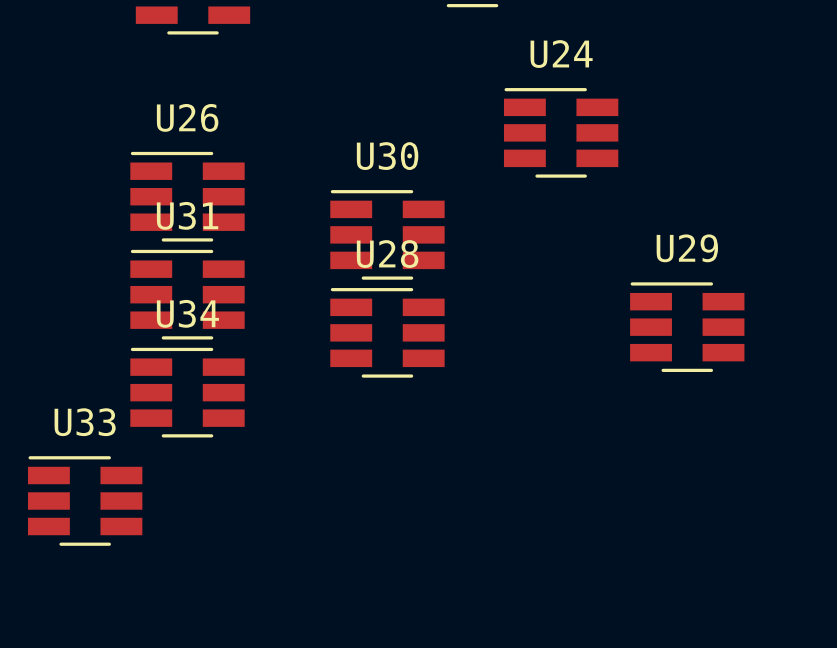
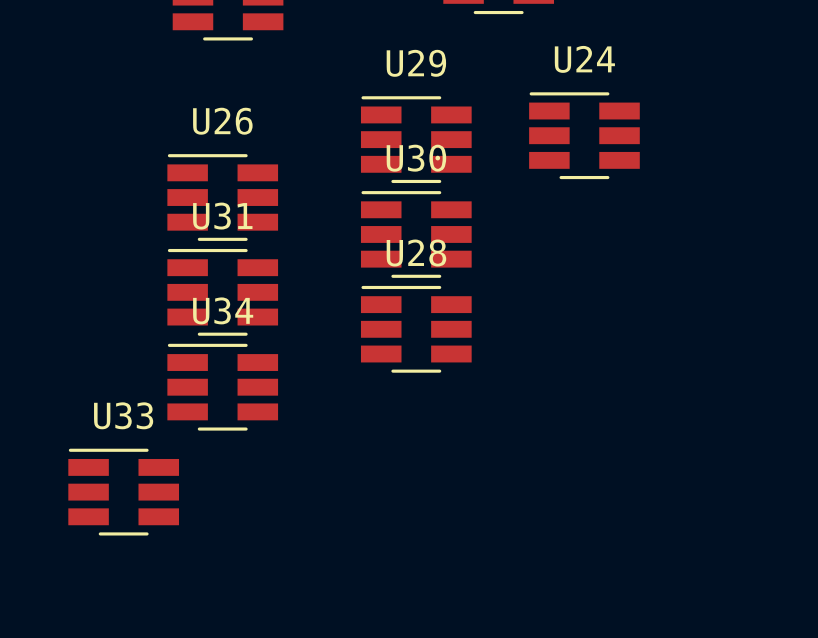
U29 position: (687, 327) -> (416, 139)

